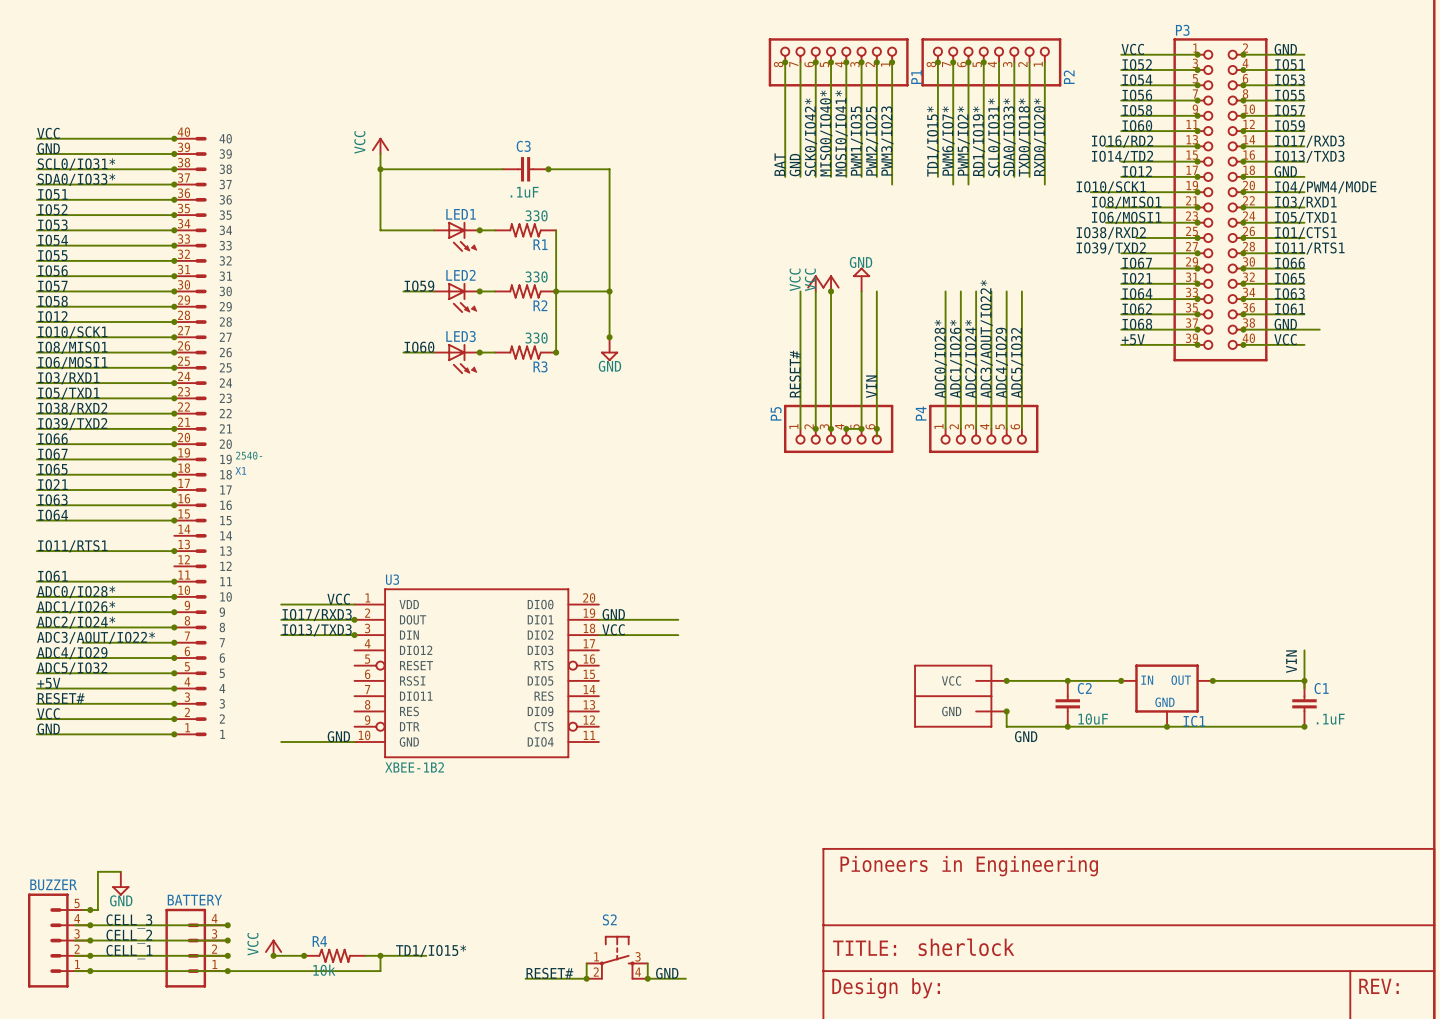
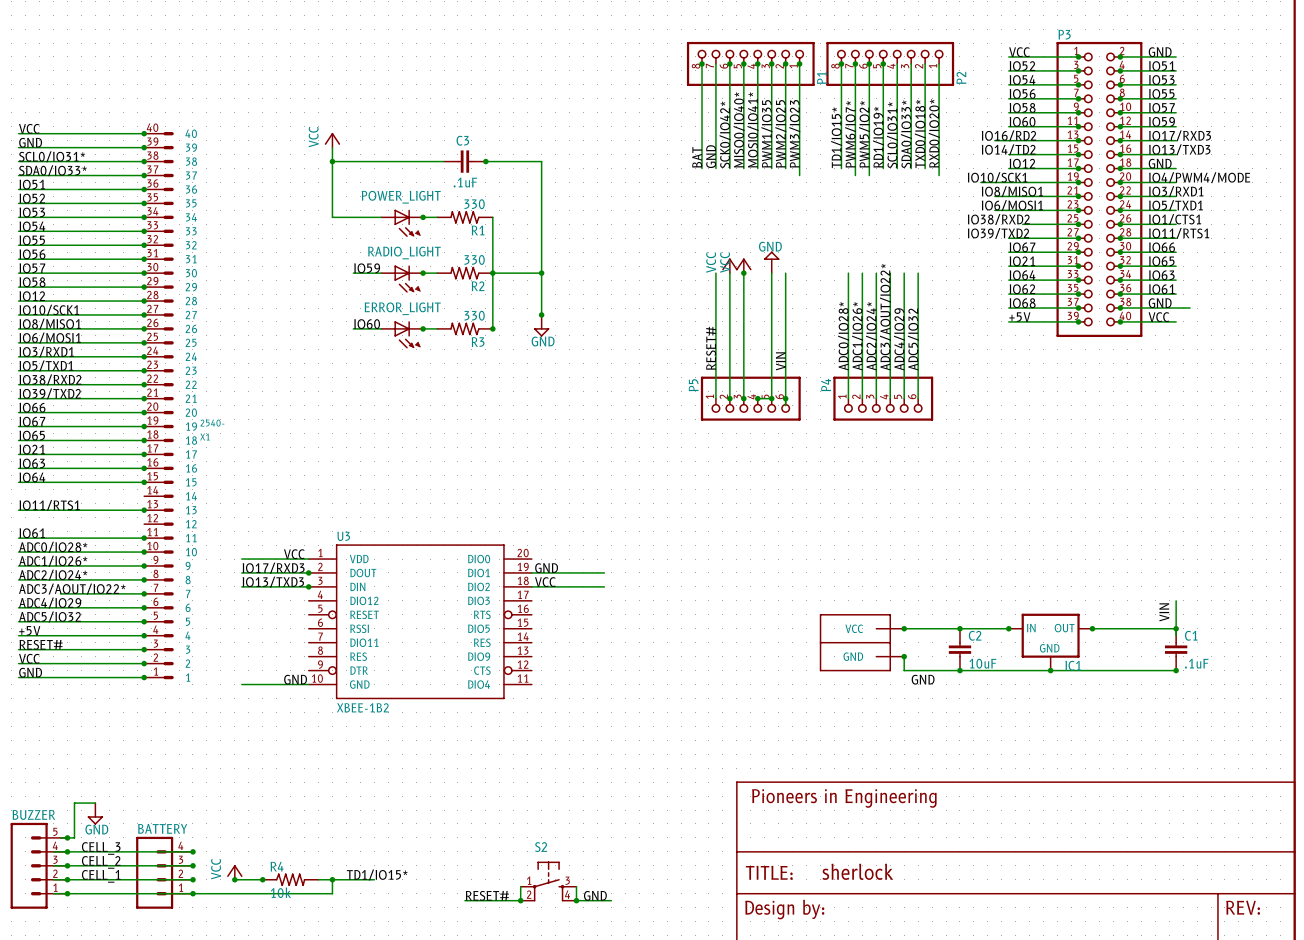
LED1 name: LED1 (461, 214) -> POWER_LIGHT (401, 197)
LED2 name: LED2 (460, 275) -> RADIO_LIGHT (404, 252)
LED3 name: LED3 (461, 336) -> ERROR_LIGHT (402, 308)

